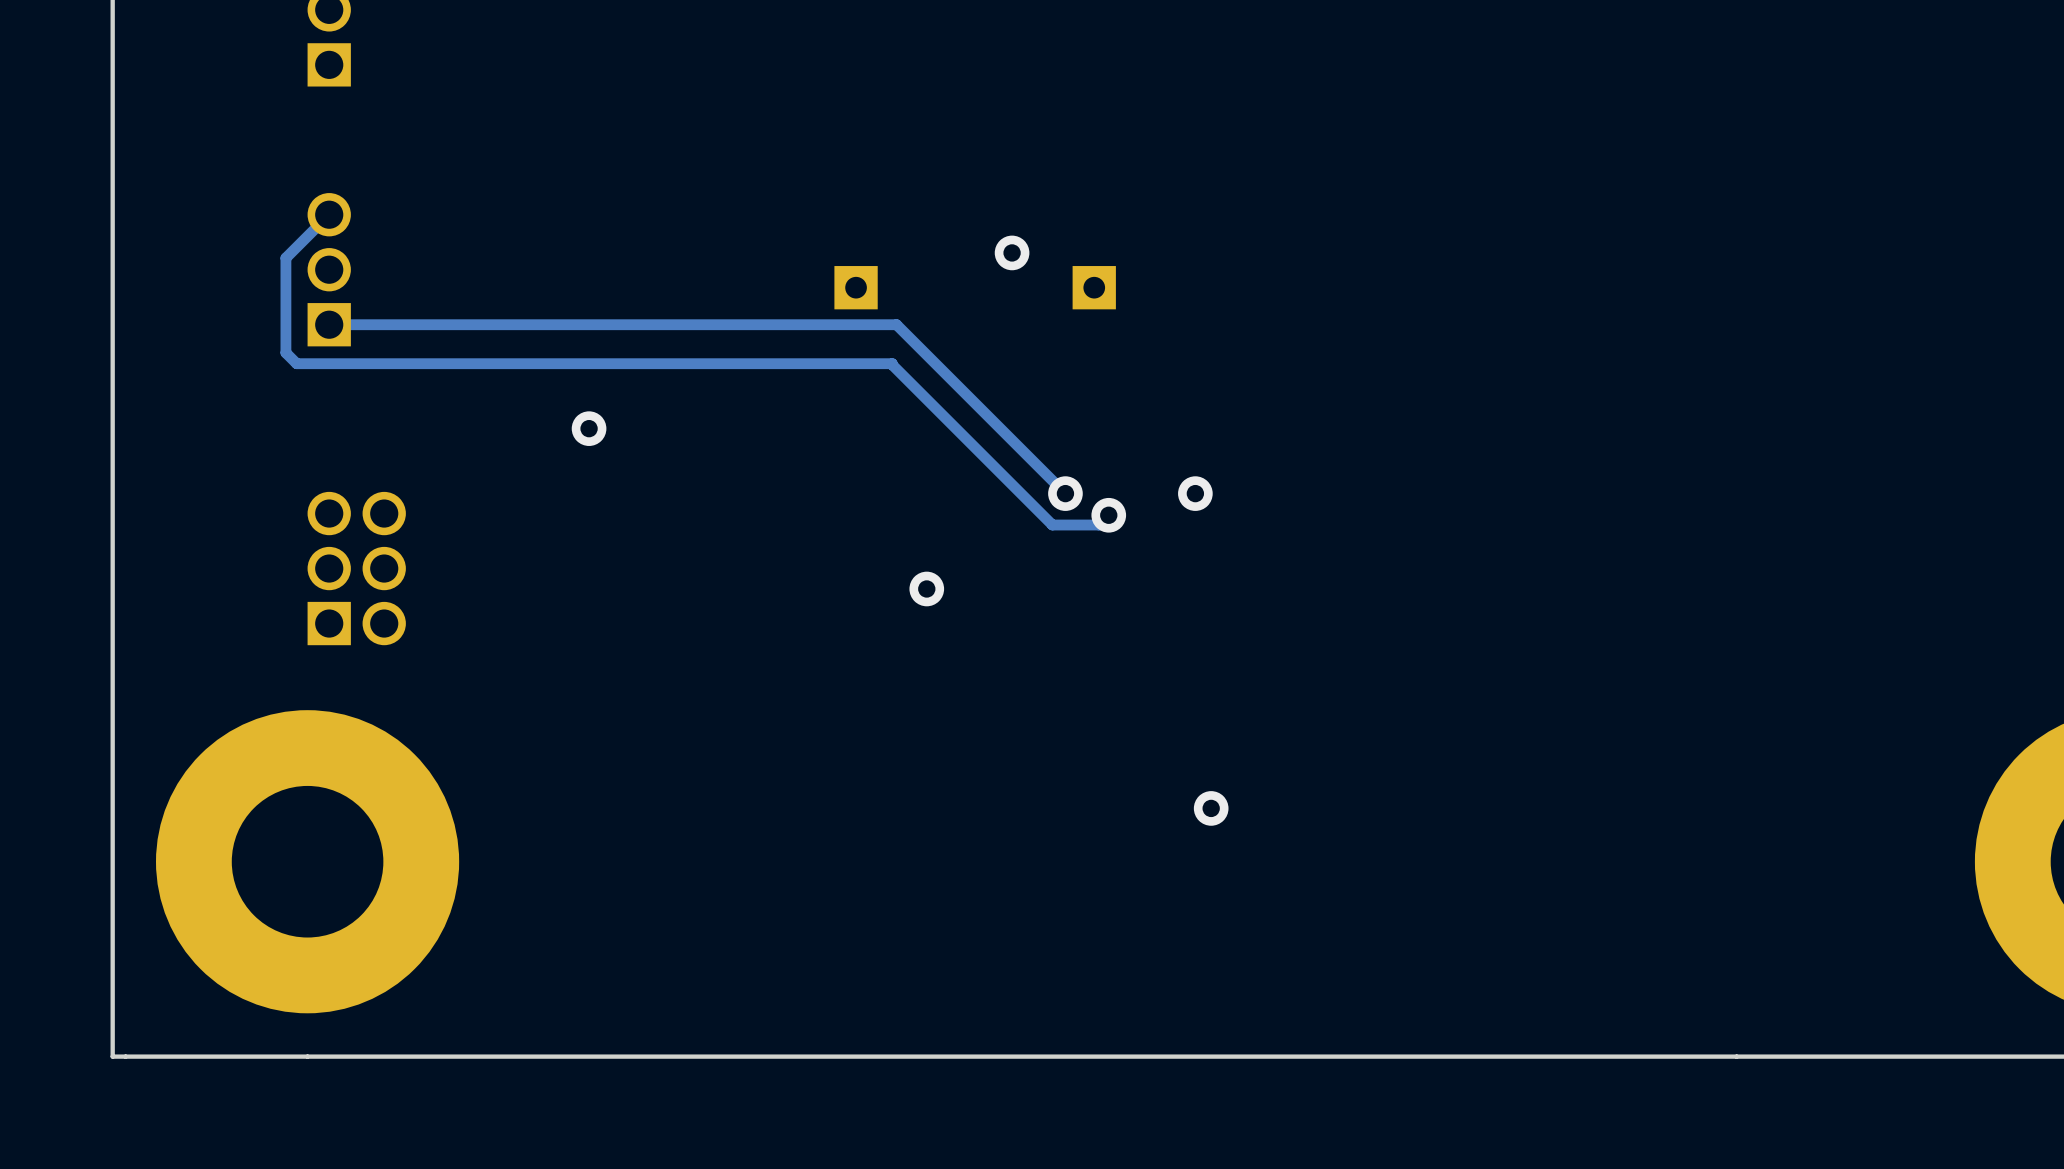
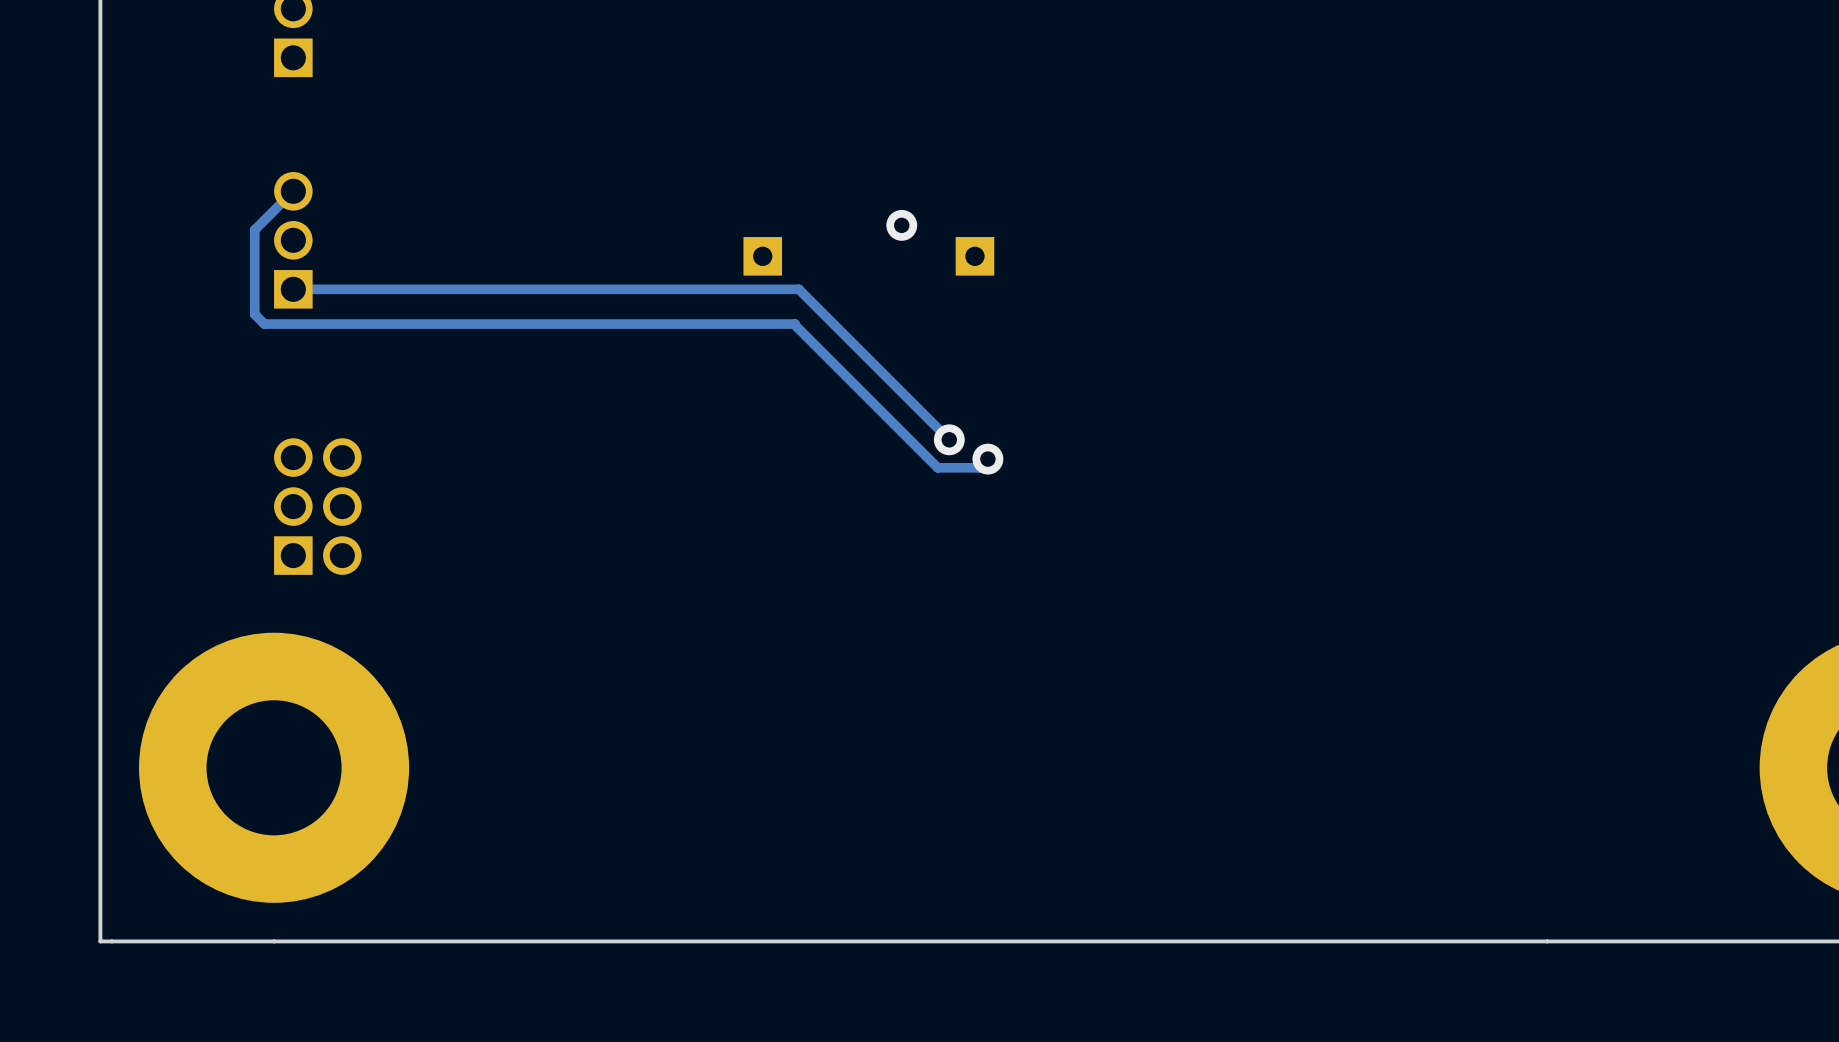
via: (589, 428) -> none
via: (1195, 493) -> none
via: (926, 588) -> none
via: (1211, 808) -> none

